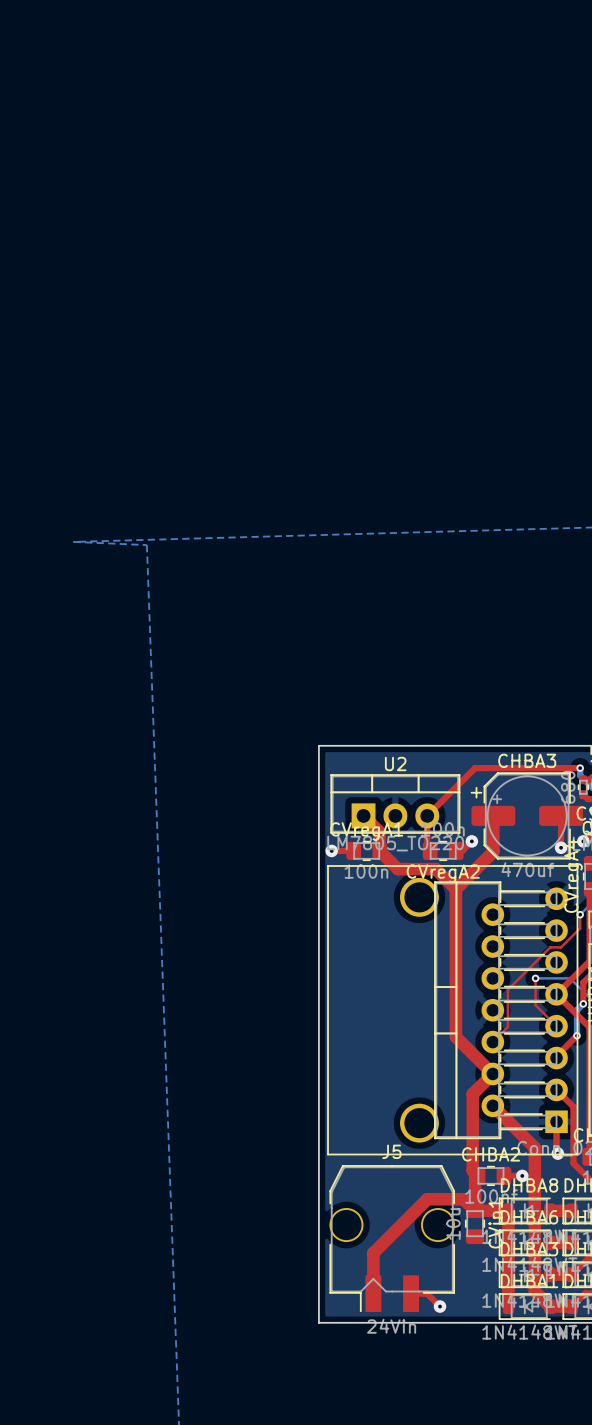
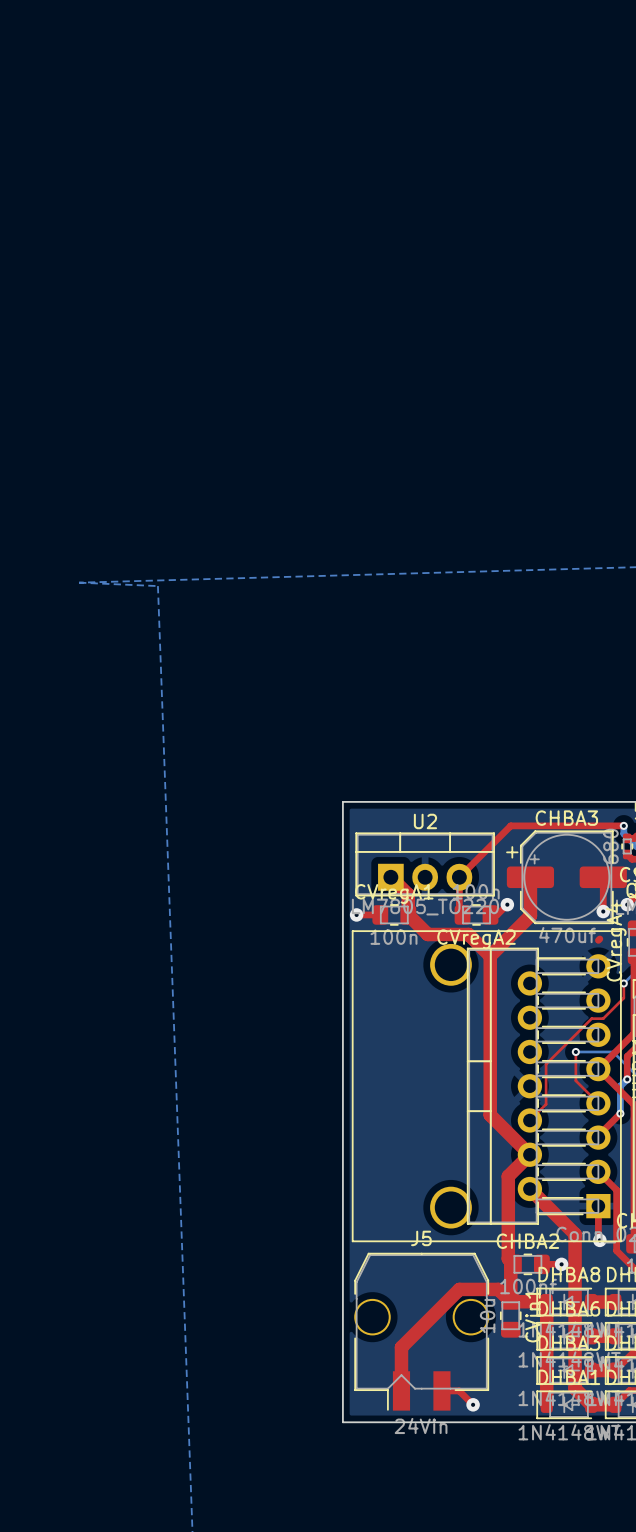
top track: none -> (599, 938) (598, 940)

